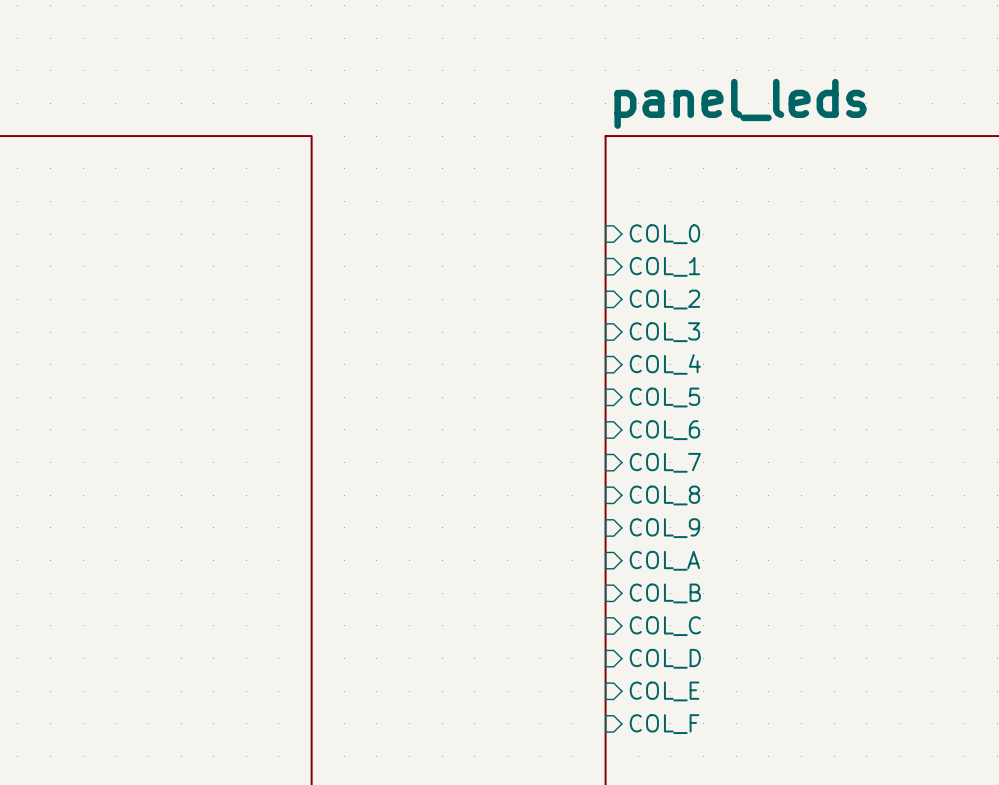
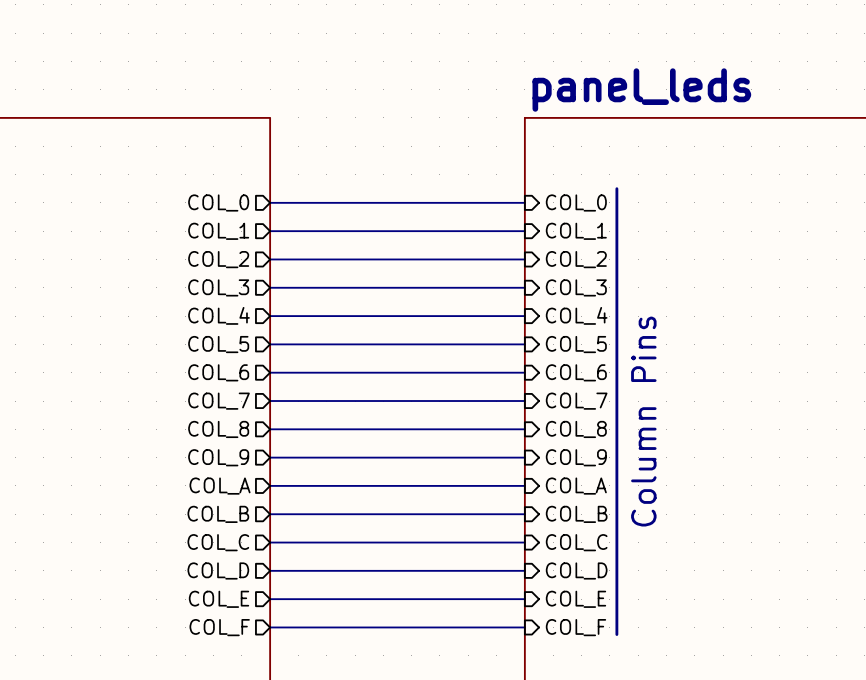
line: none -> (616, 188) (616, 634)
sheet pin: none -> COL_0 (218, 202)
wire: none -> (270, 202) (524, 202)
sheet pin: none -> COL_1 (218, 231)
wire: none -> (270, 231) (524, 231)
sheet pin: none -> COL_2 (218, 259)
wire: none -> (270, 259) (524, 259)
sheet pin: none -> COL_3 (218, 287)
wire: none -> (270, 287) (524, 287)
sheet pin: none -> COL_4 (219, 315)
wire: none -> (270, 316) (524, 316)
sheet pin: none -> COL_5 (218, 344)
wire: none -> (270, 344) (524, 344)
wire: none -> (270, 372) (524, 372)
sheet pin: none -> COL_6 (218, 372)
sheet pin: none -> COL_7 (219, 401)
wire: none -> (270, 401) (524, 401)
text: none -> Column Pins (643, 421)
sheet pin: none -> COL_8 (218, 429)
wire: none -> (270, 429) (524, 429)
wire: none -> (270, 457) (524, 457)
sheet pin: none -> COL_9 (218, 457)
sheet pin: none -> COL_A (220, 486)
wire: none -> (270, 485) (524, 485)
sheet pin: none -> COL_B (218, 514)
wire: none -> (270, 514) (524, 514)
wire: none -> (270, 542) (524, 542)
sheet pin: none -> COL_C (218, 542)
sheet pin: none -> COL_D (218, 570)
wire: none -> (270, 570) (524, 570)
sheet pin: none -> COL_E (219, 599)
wire: none -> (270, 599) (524, 599)
wire: none -> (270, 627) (524, 627)
sheet pin: none -> COL_F (219, 627)

